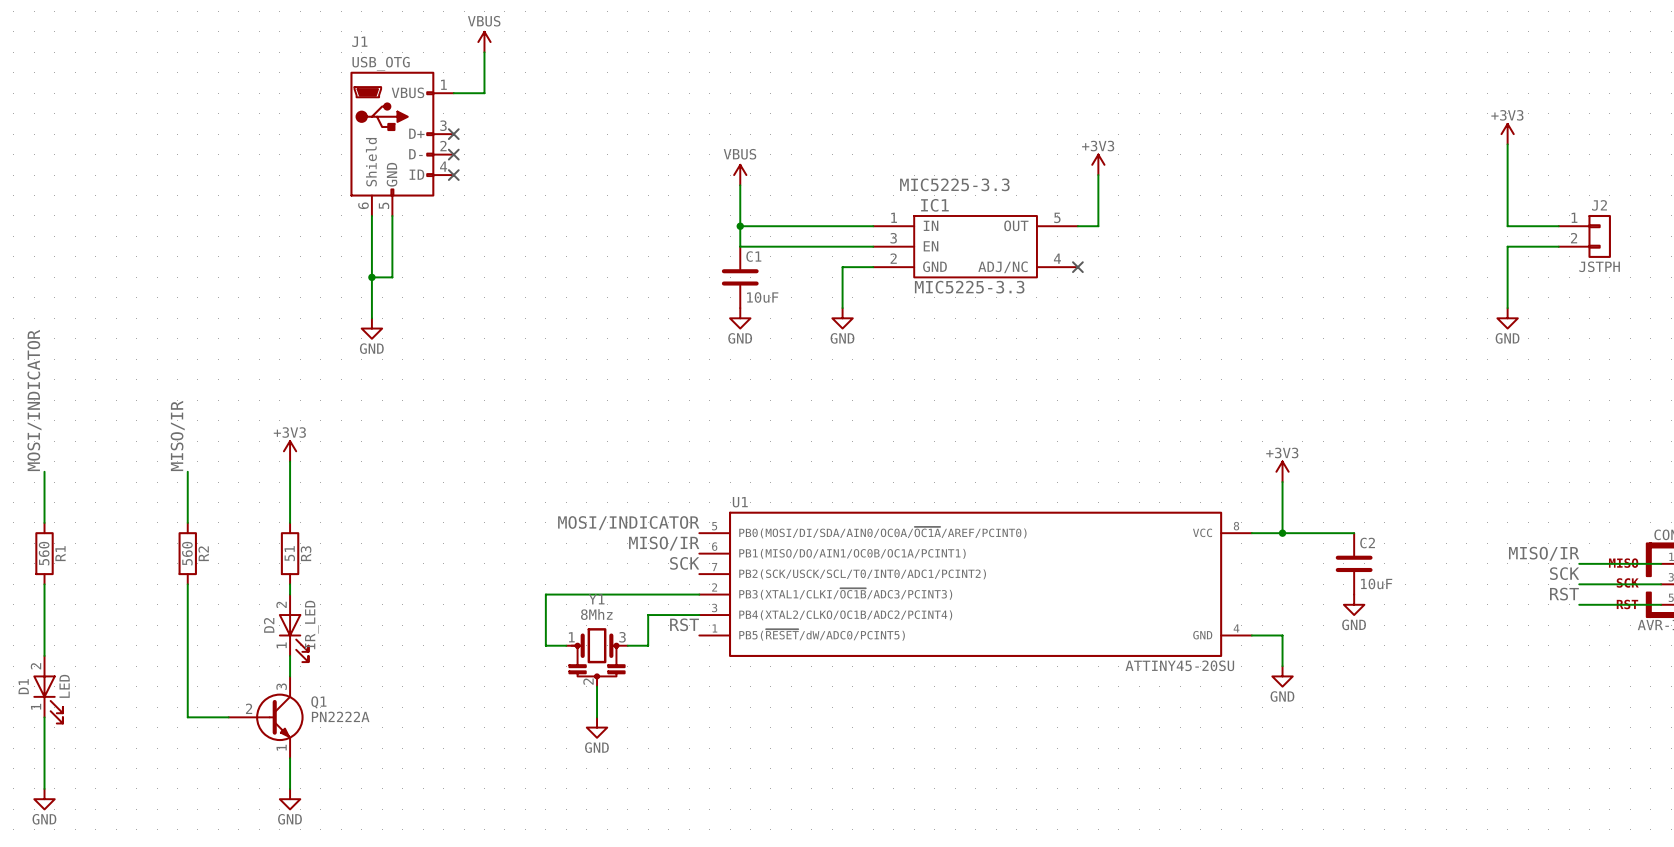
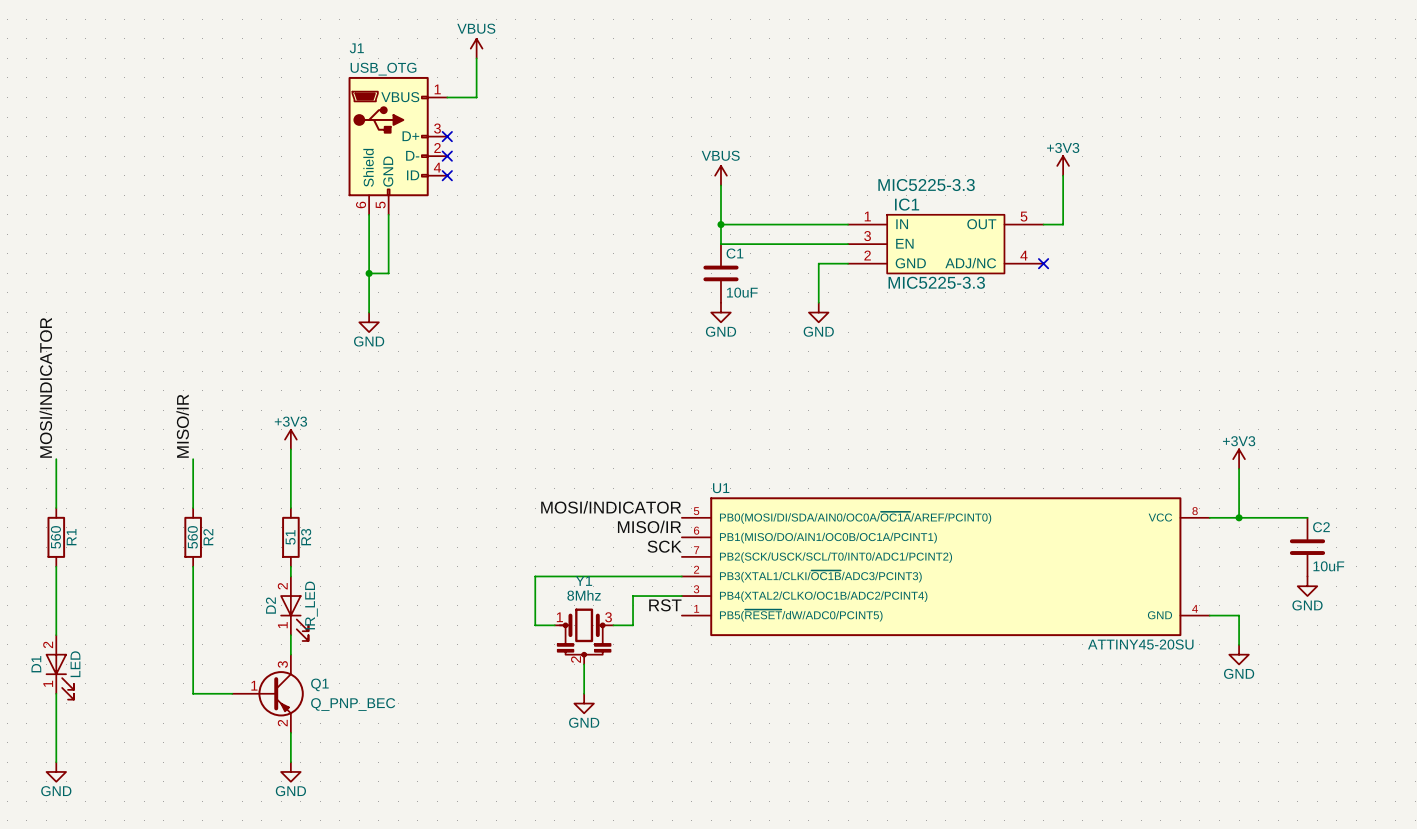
Q1 symbol: [228, 676, 304, 759] -> [232, 654, 304, 733]
Q1 value: PN2222A (340, 716) -> Q_PNP_BEC (353, 704)

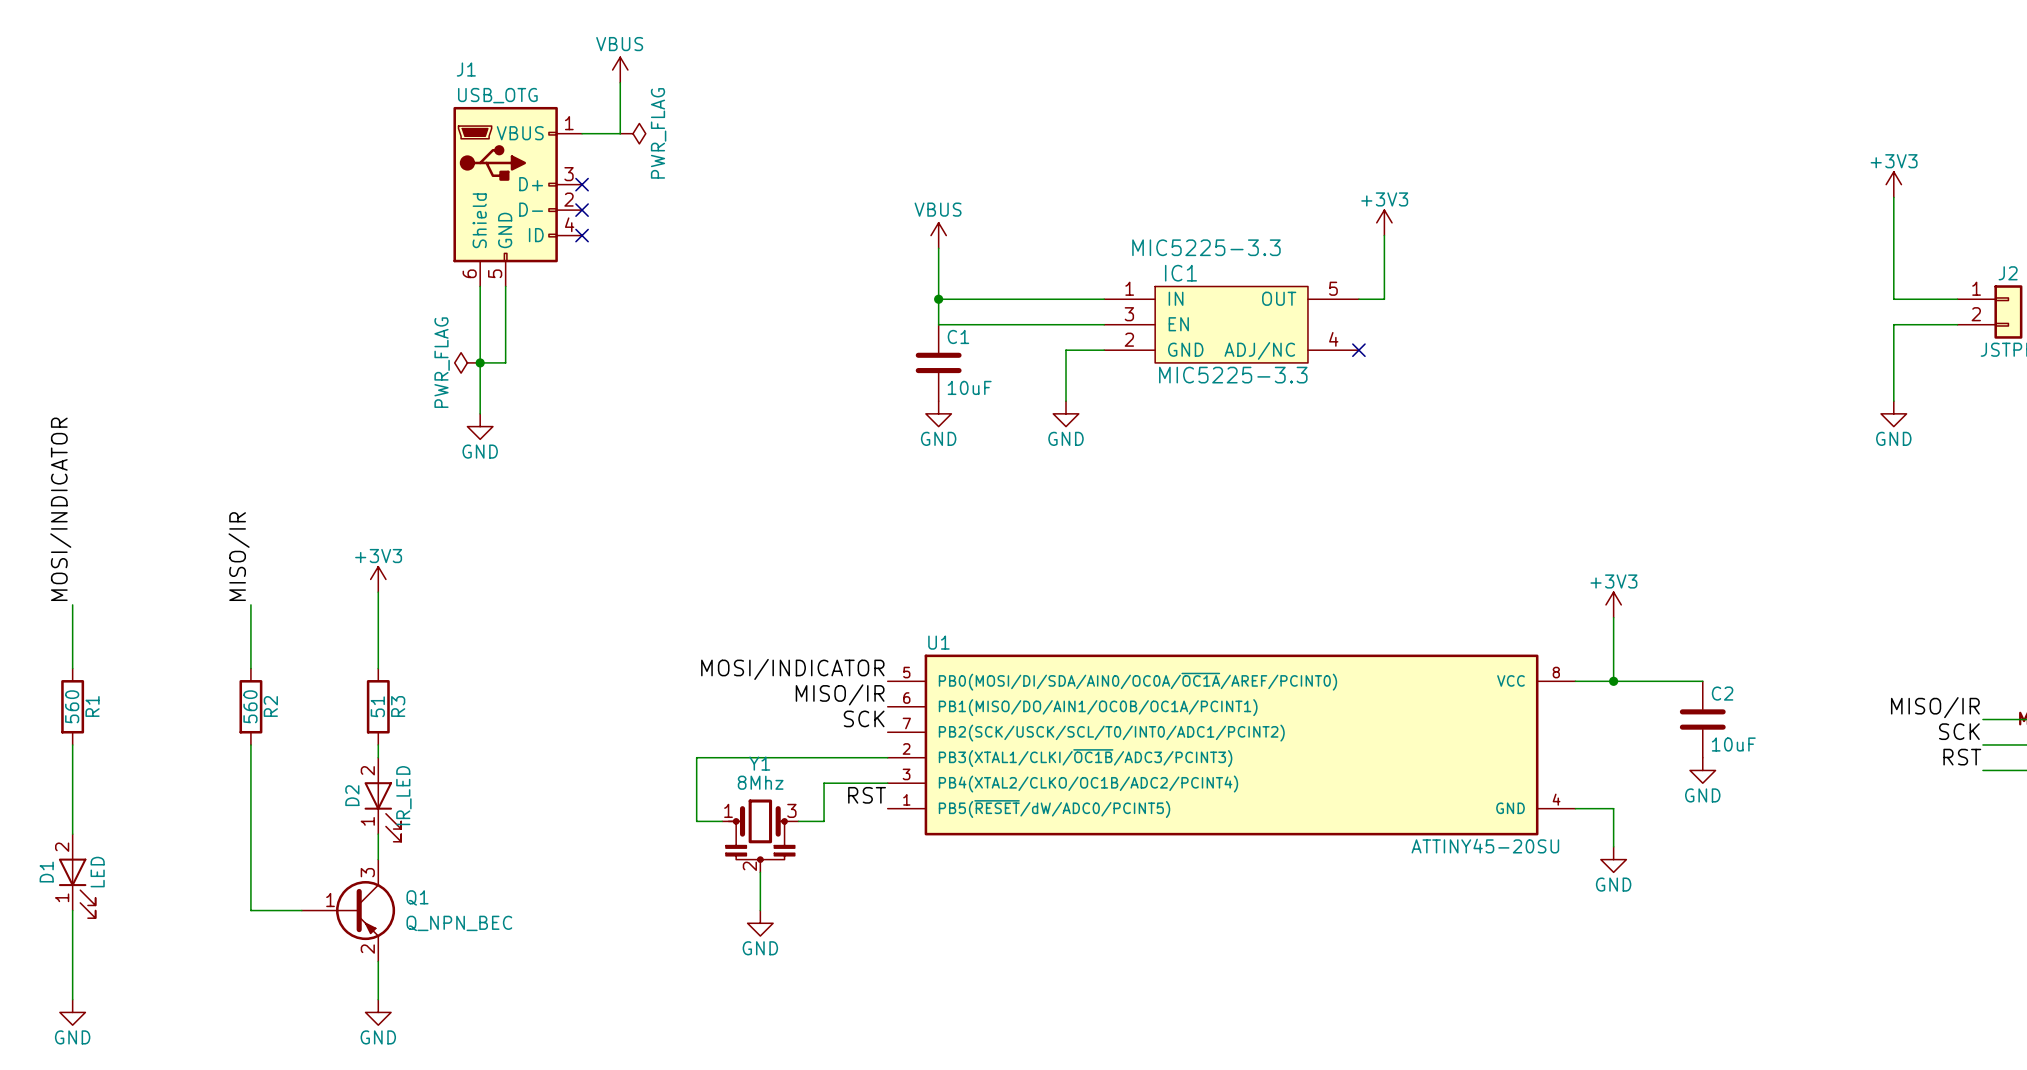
power symbol: none -> PWR_FLAG (633, 133)
power symbol: none -> PWR_FLAG (467, 362)
Q1 value: Q_PNP_BEC (353, 704) -> Q_NPN_BEC (459, 923)

